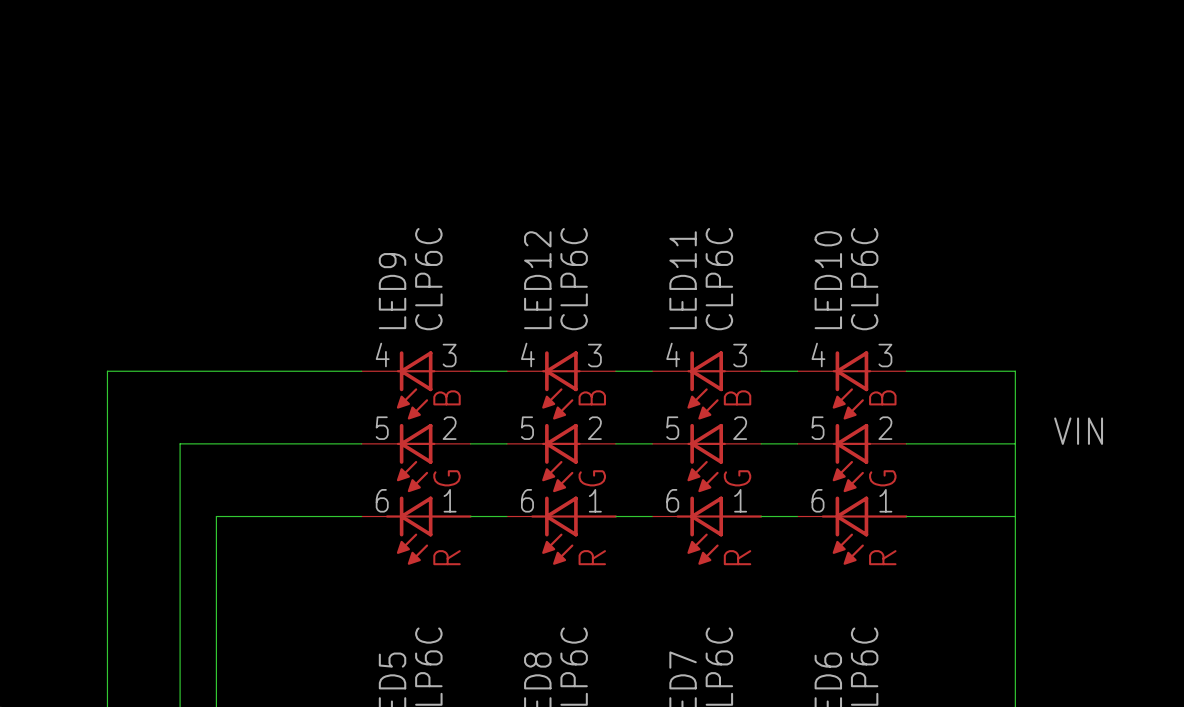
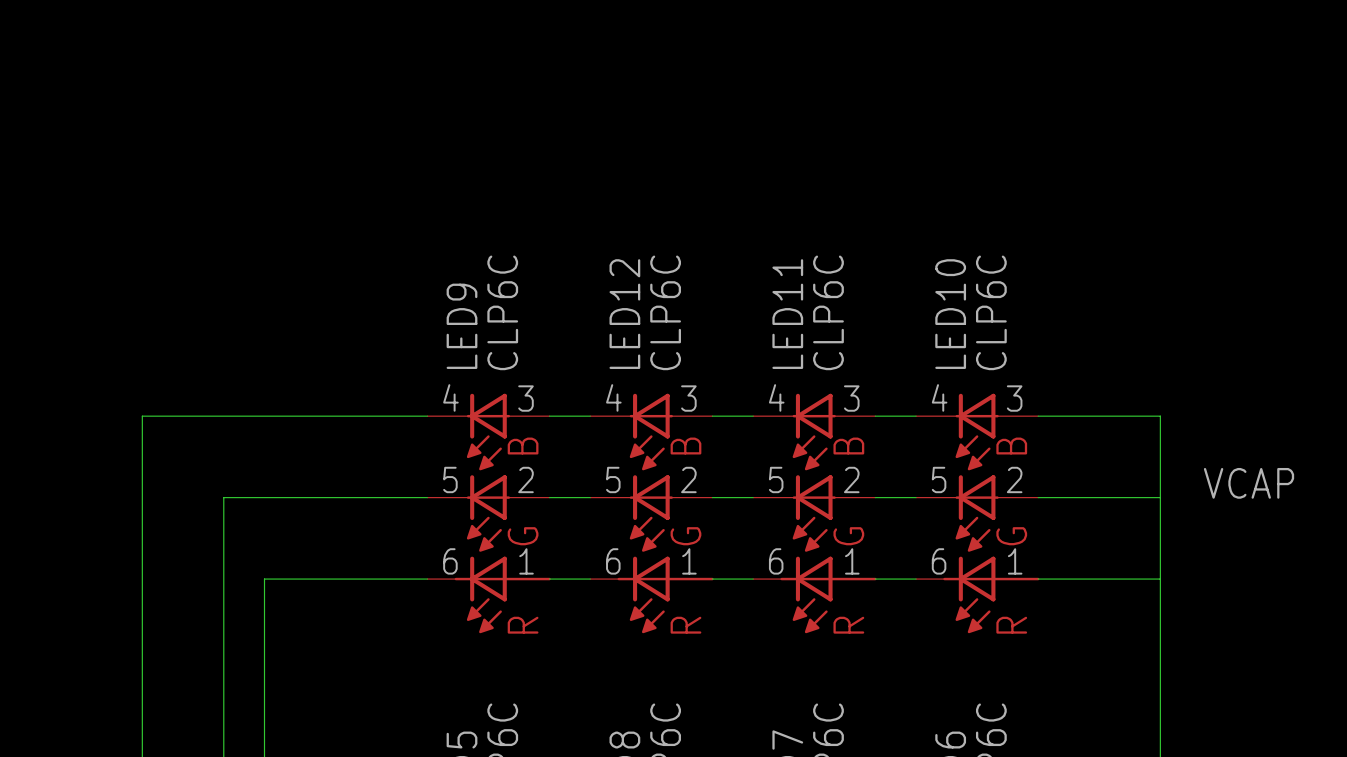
label: VIN (1078, 431) -> VCAP (1249, 483)

